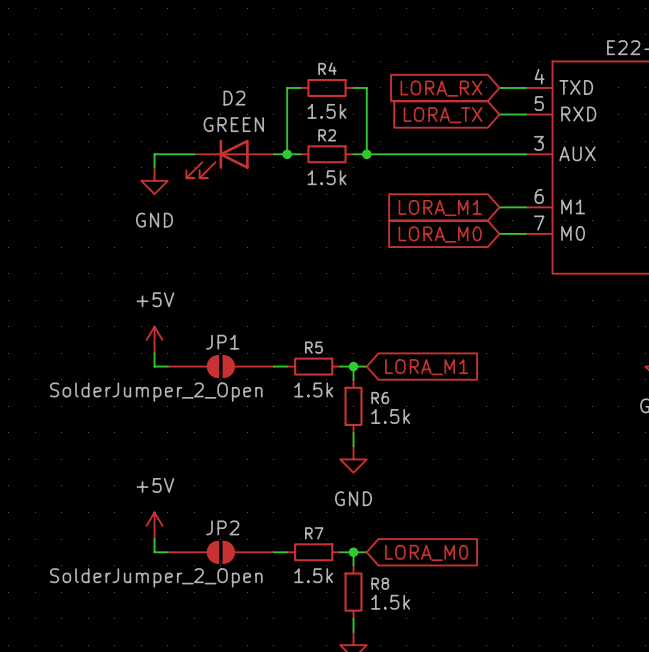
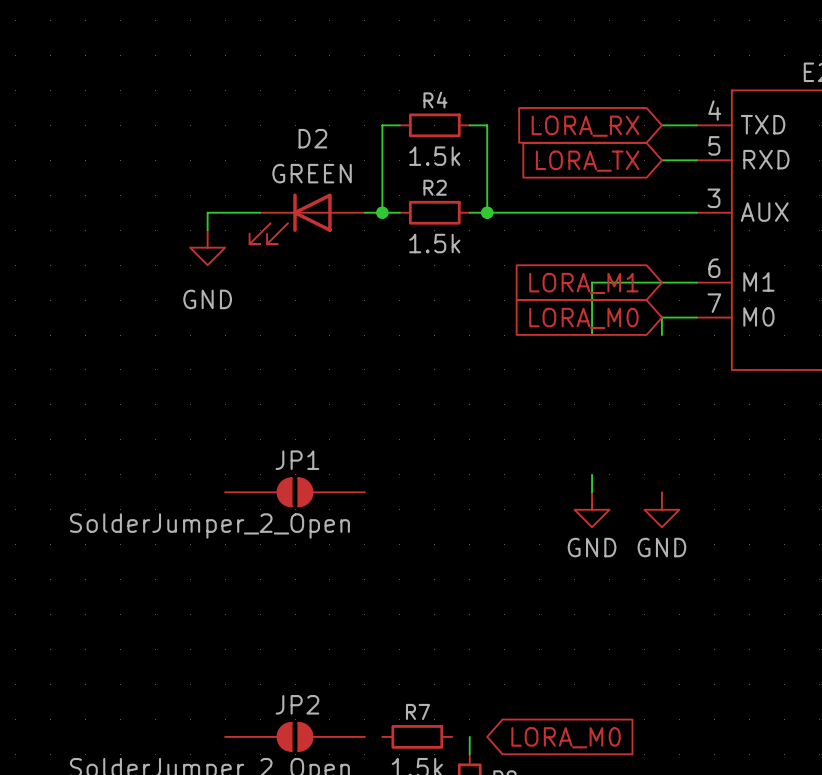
wire: none -> (661, 282) (592, 282) (592, 335)
power symbol: +5V (154, 340) -> none
wire: (154, 353) (154, 366) (167, 366) -> none
wire: (273, 366) (287, 366) -> none
R5: 1.5k (313, 366) -> none
wire: (340, 366) (366, 366) -> none
wire: (353, 366) (353, 379) -> (592, 474) (592, 492)
junction: (353, 366) -> none
global label: LORA_M1 (426, 367) -> none
power symbol: none -> GND (592, 509)
power symbol: none -> GND (661, 509)
R6: 1.5k (353, 406) -> none
wire: (353, 432) (353, 446) -> (661, 317) (661, 335)
power symbol: GND (353, 459) -> none
power symbol: +5V (154, 525) -> none
wire: (154, 539) (154, 552) (167, 552) -> none
wire: (273, 552) (287, 552) -> none
wire: (340, 552) (366, 552) -> none
junction: (353, 552) -> none

